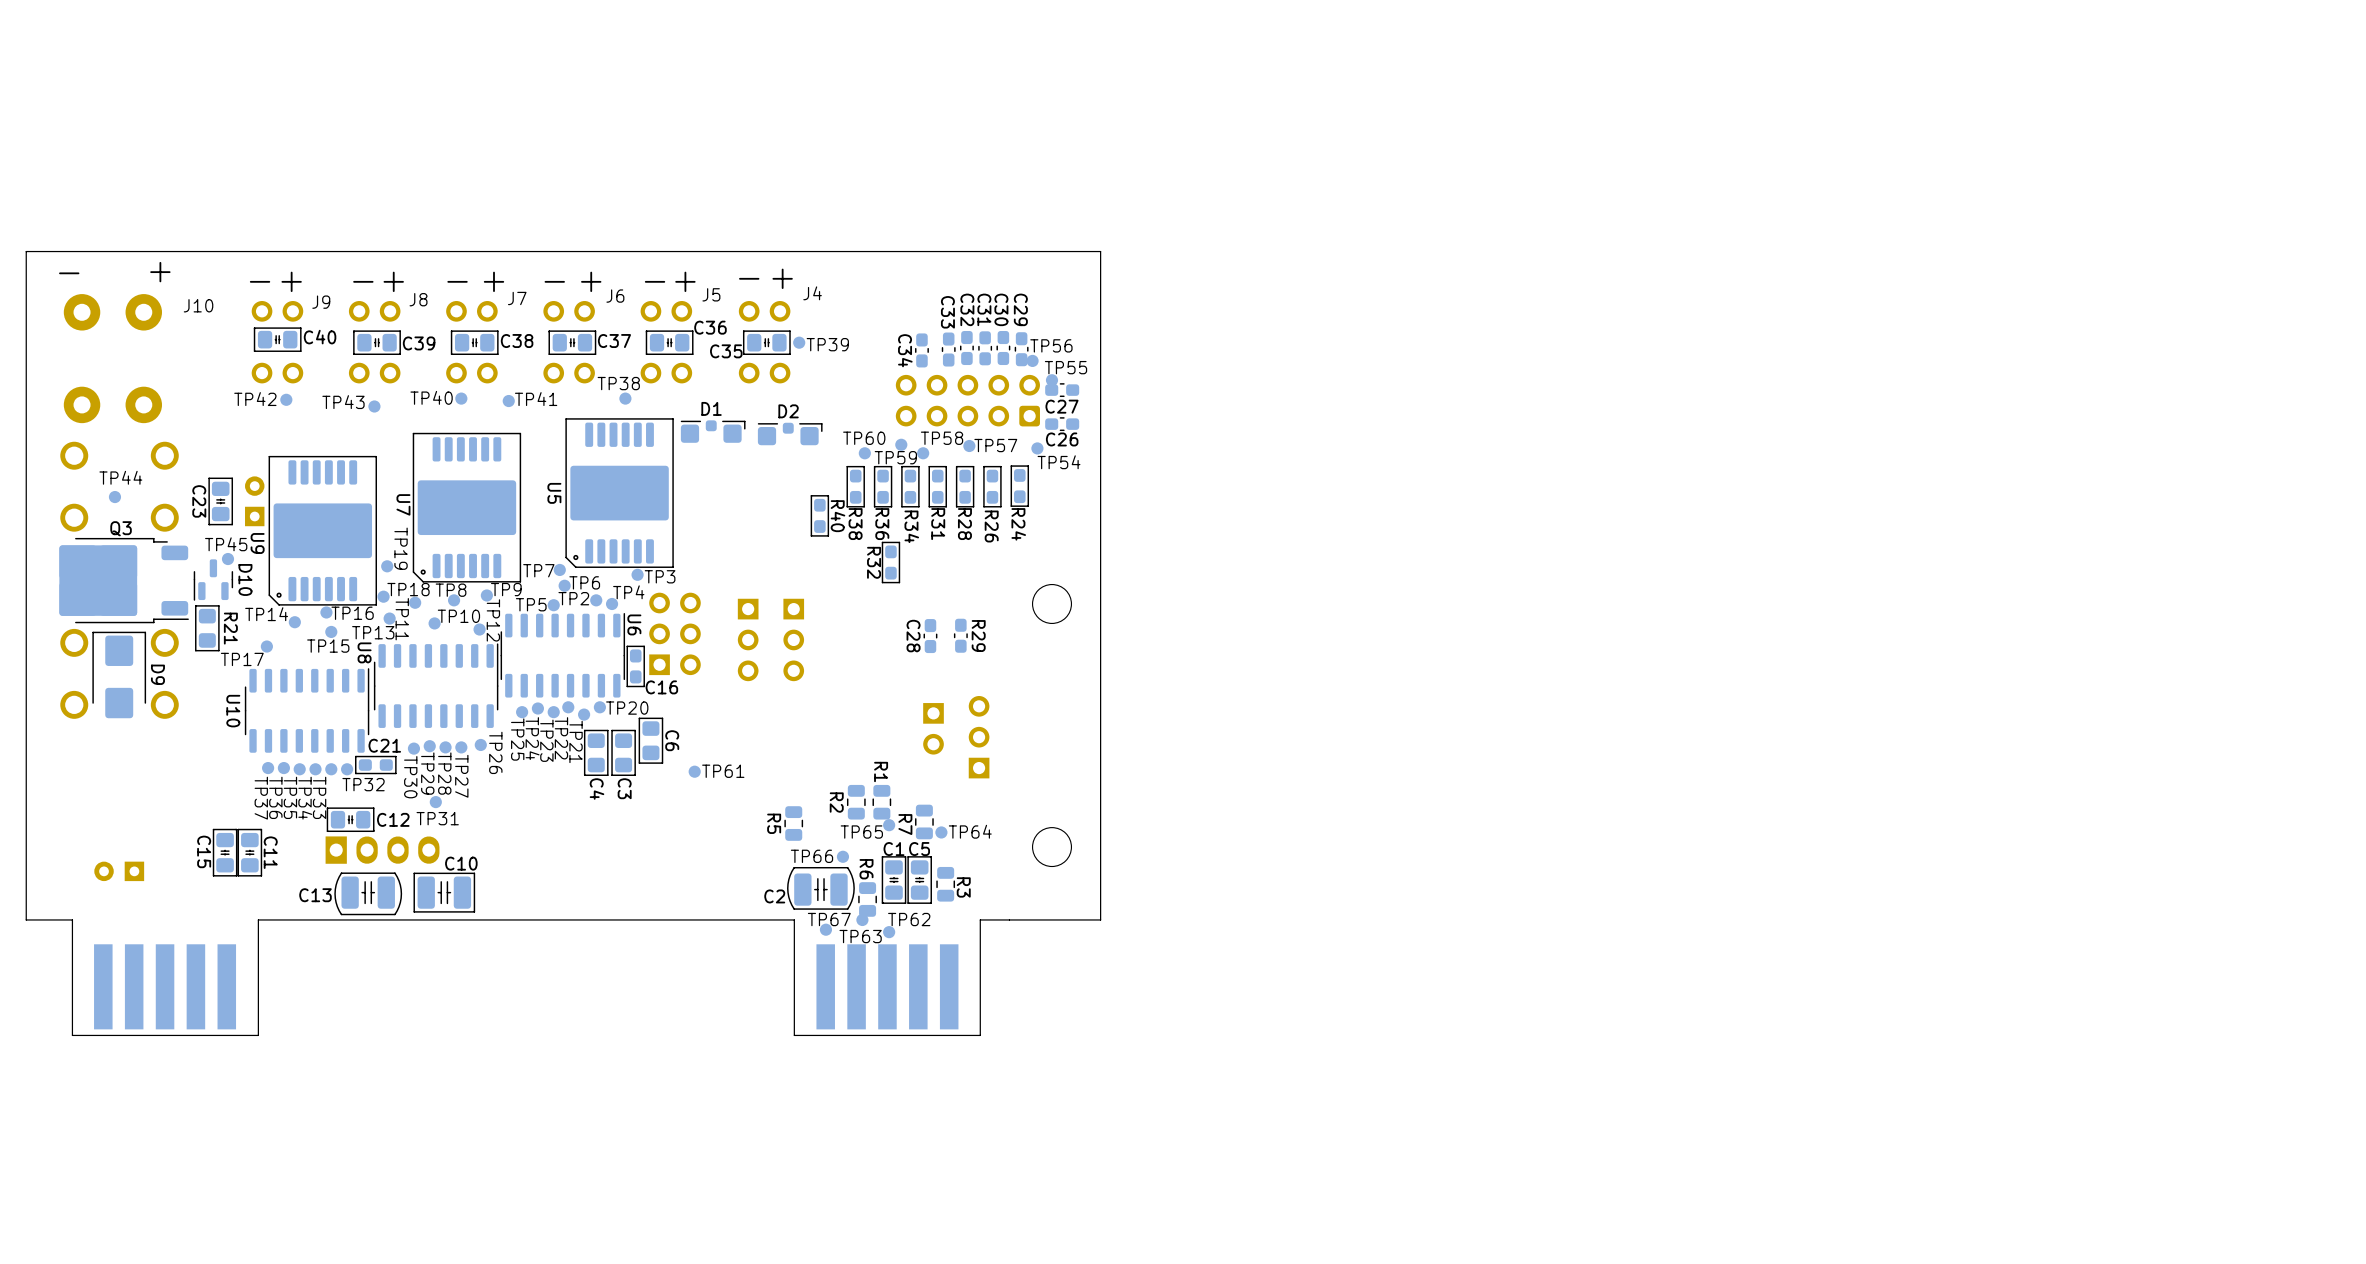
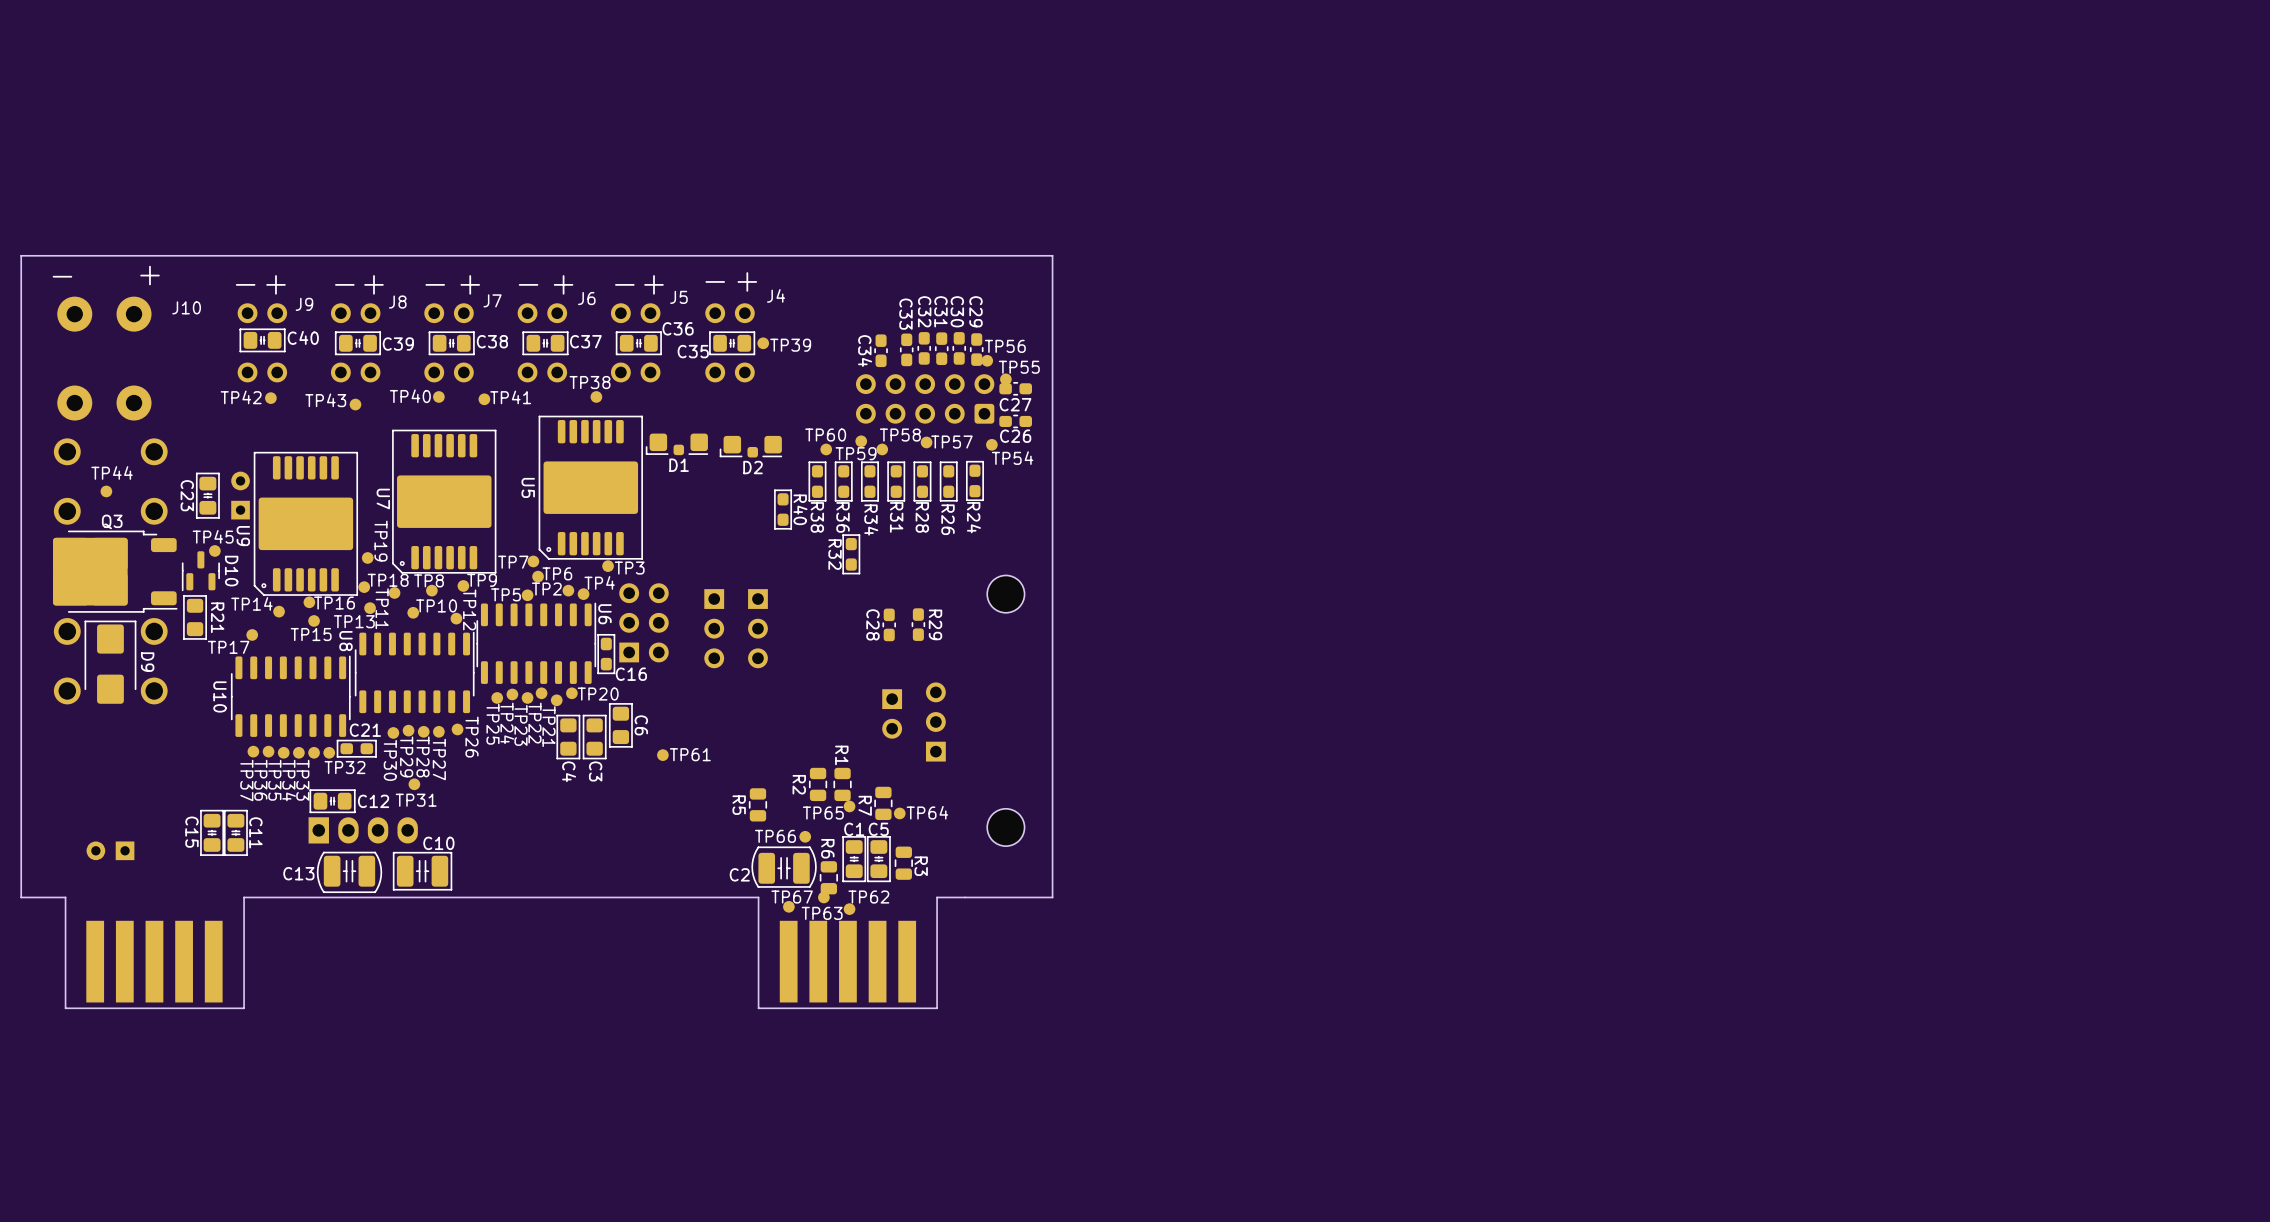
D1 rotation: 0° (713, 431) -> 180° (676, 444)
D2 rotation: 0° (790, 433) -> 180° (750, 446)

